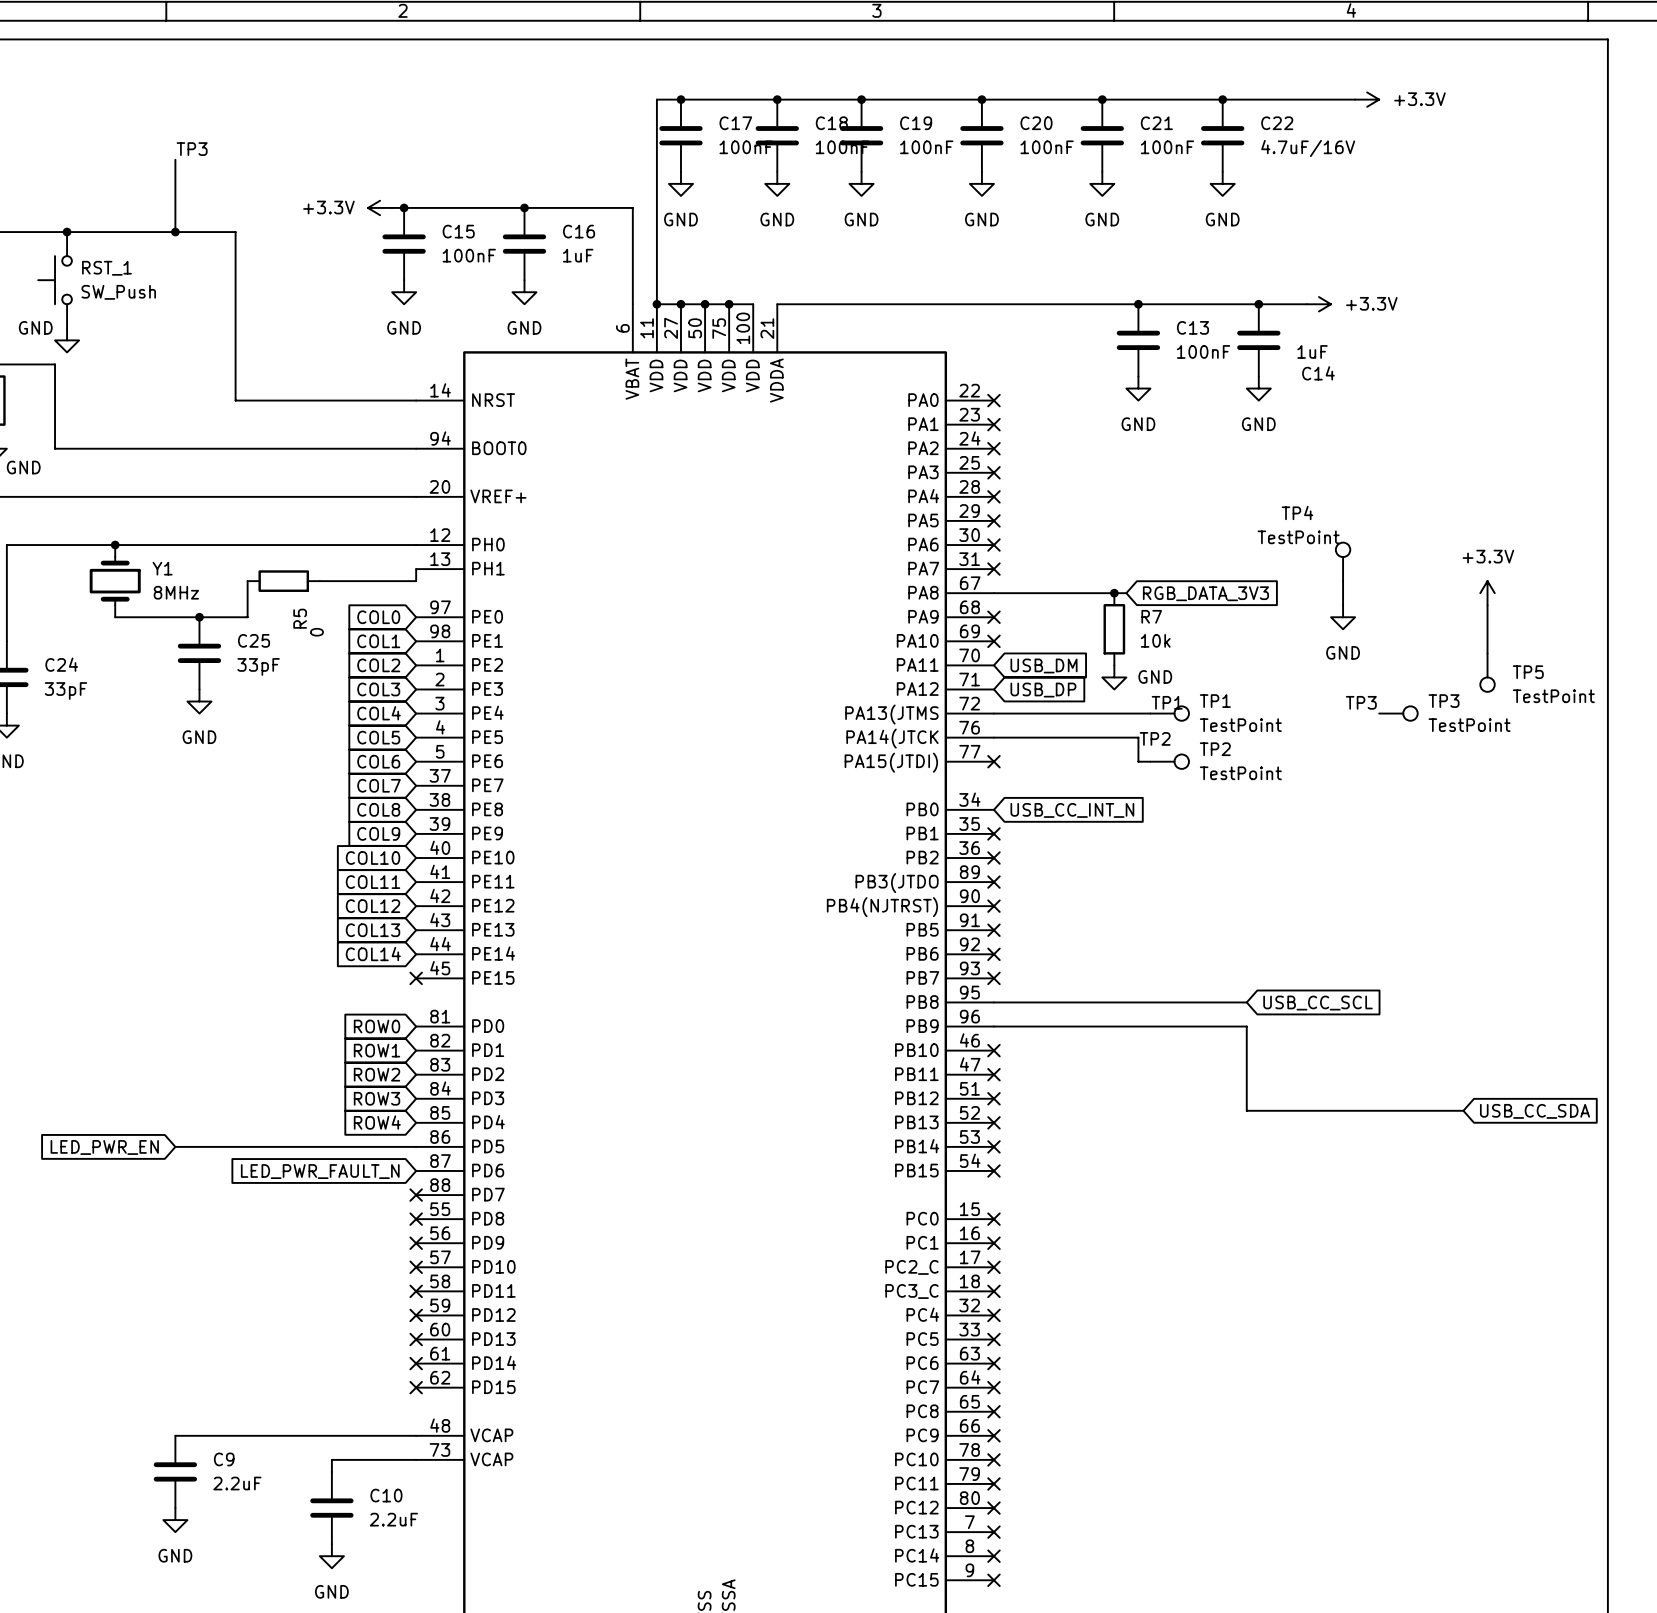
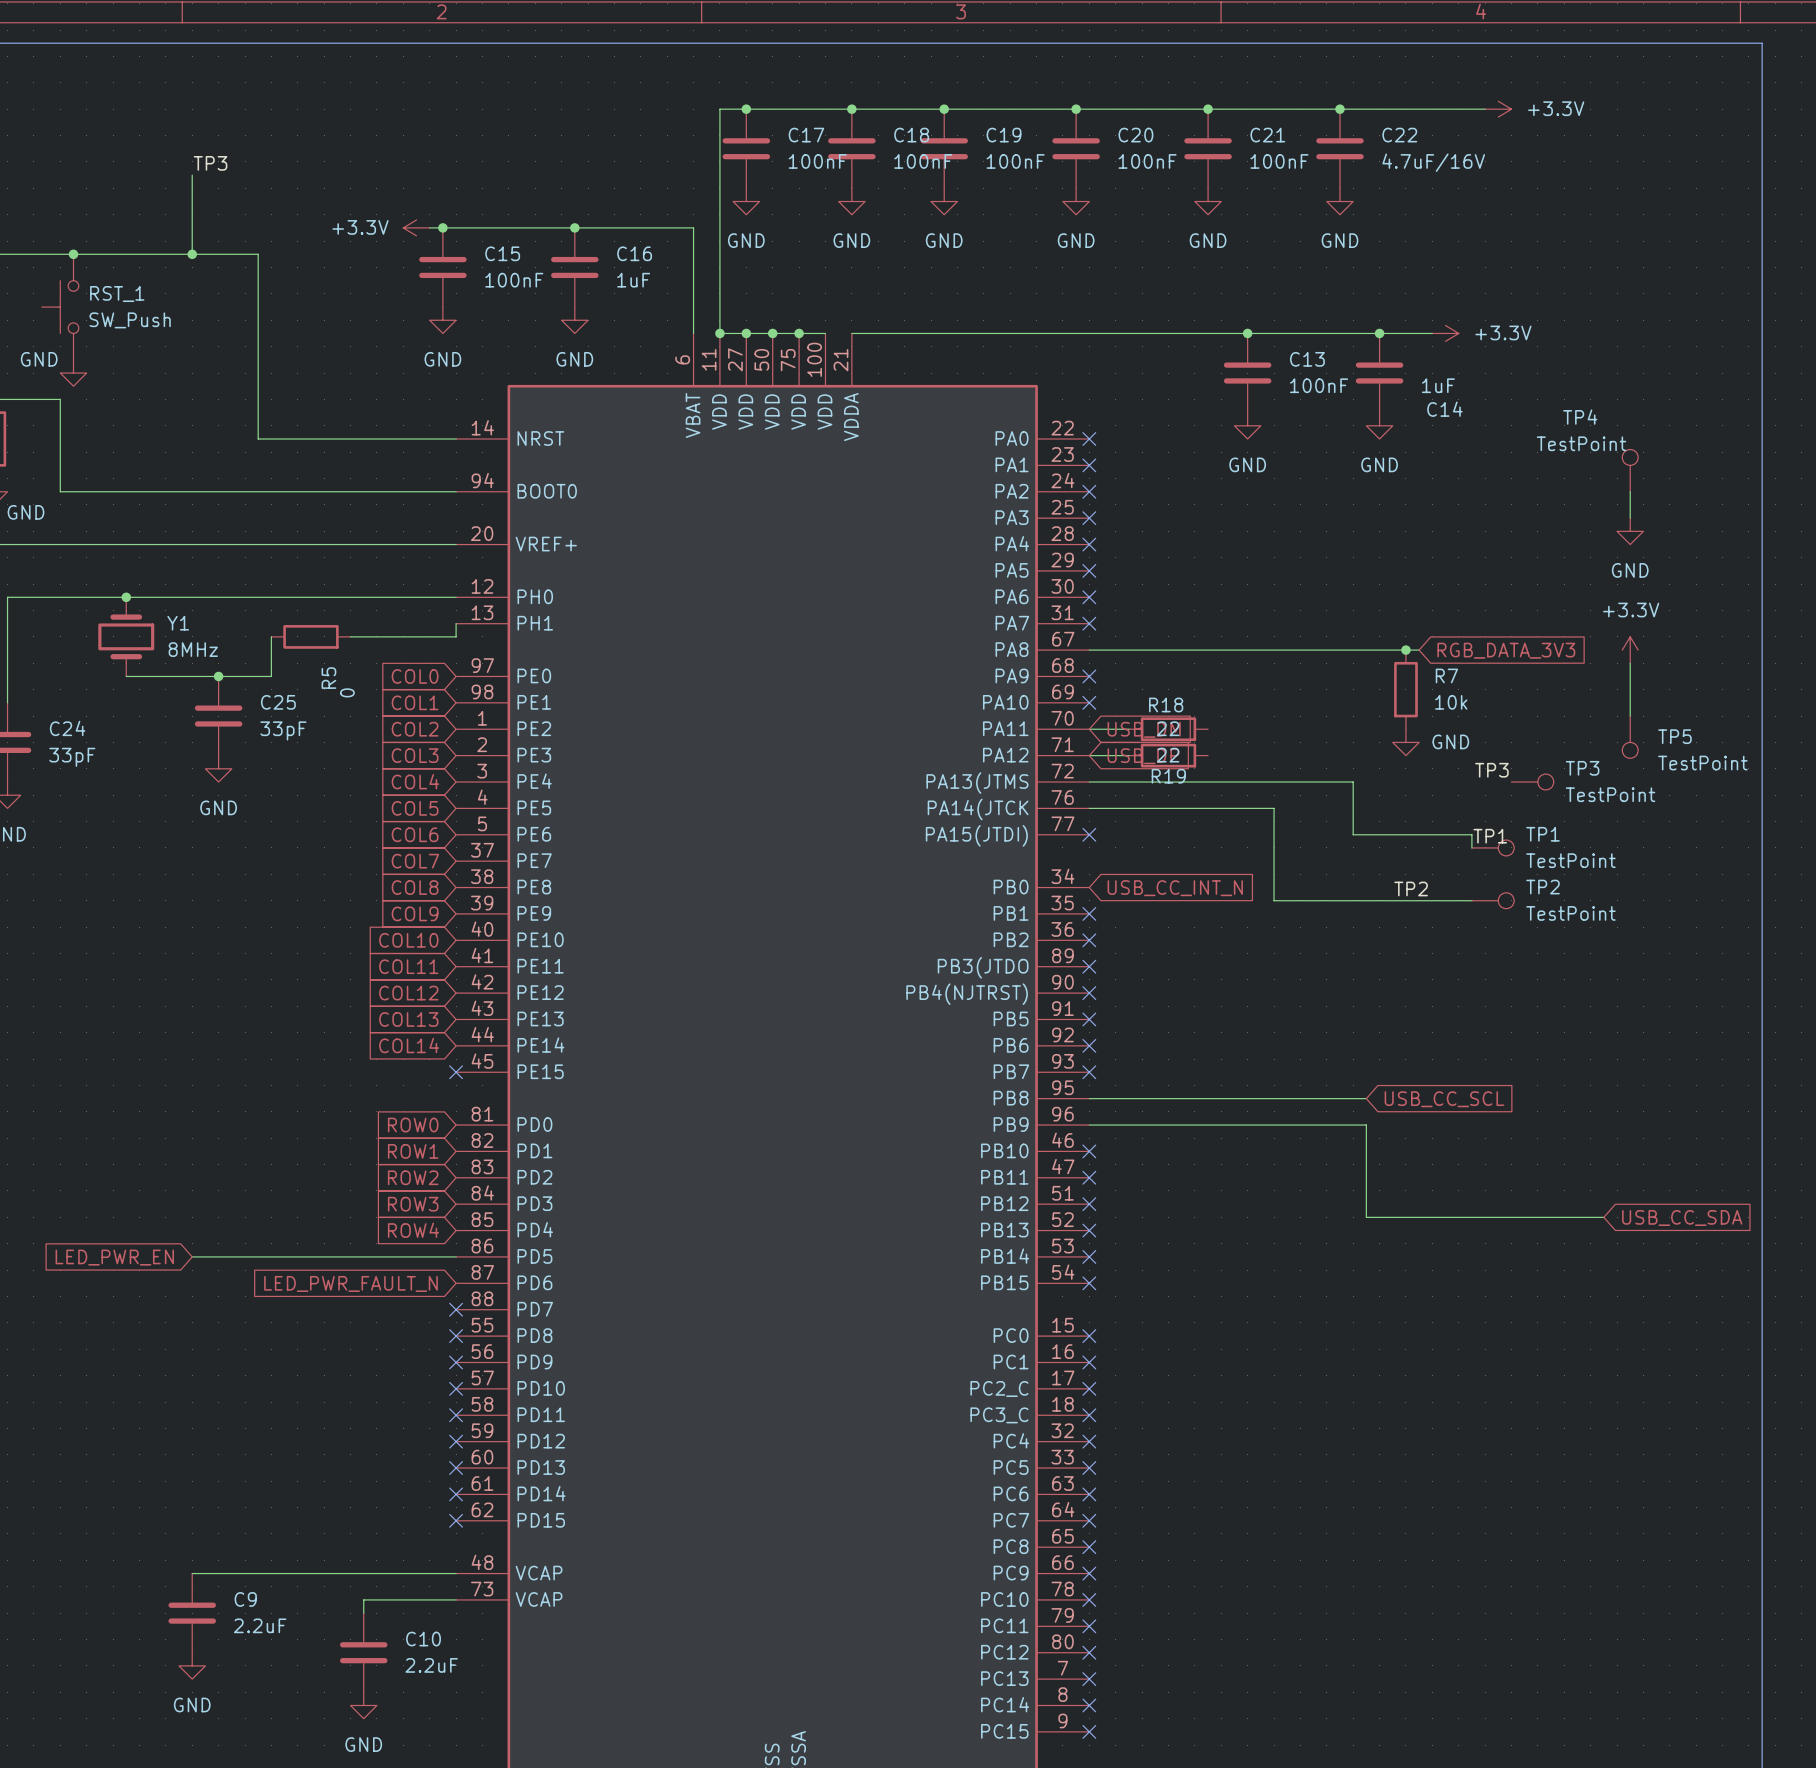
power symbol: none -> GND (1630, 531)
TP4 position: (1343, 561) -> (1630, 470)
wire: (1343, 581) (1343, 605) -> (1630, 491) (1630, 518)
junction: (1114, 593) -> none
wire: none -> (1234, 650) (1419, 650)
global label position: RGB_DATA_3V3 (1205, 593) -> RGB_DATA_3V3 (1506, 650)
junction: none -> (1405, 650)
power symbol: GND (1343, 617) -> none
R7 position: (1114, 629) -> (1405, 689)
wire: none -> (1089, 729) (1128, 729)
R18: none -> 22 (1168, 729)
power symbol: GND (1114, 677) -> none
power symbol: none -> GND (1405, 742)
wire: none -> (1089, 755) (1128, 755)
R19: none -> 22 (1168, 755)
label position: TP1 (1167, 702) -> TP1 (1490, 836)
wire: none -> (1260, 782) (1353, 782) (1353, 834) (1471, 834) (1471, 847)
TP1 position: (1169, 713) -> (1493, 847)
wire: (1138, 737) (1138, 761) (1150, 761) -> (1247, 808) (1274, 808) (1274, 900) (1471, 900)
label position: TP2 (1155, 738) -> TP2 (1411, 888)
TP2 position: (1169, 761) -> (1493, 900)

